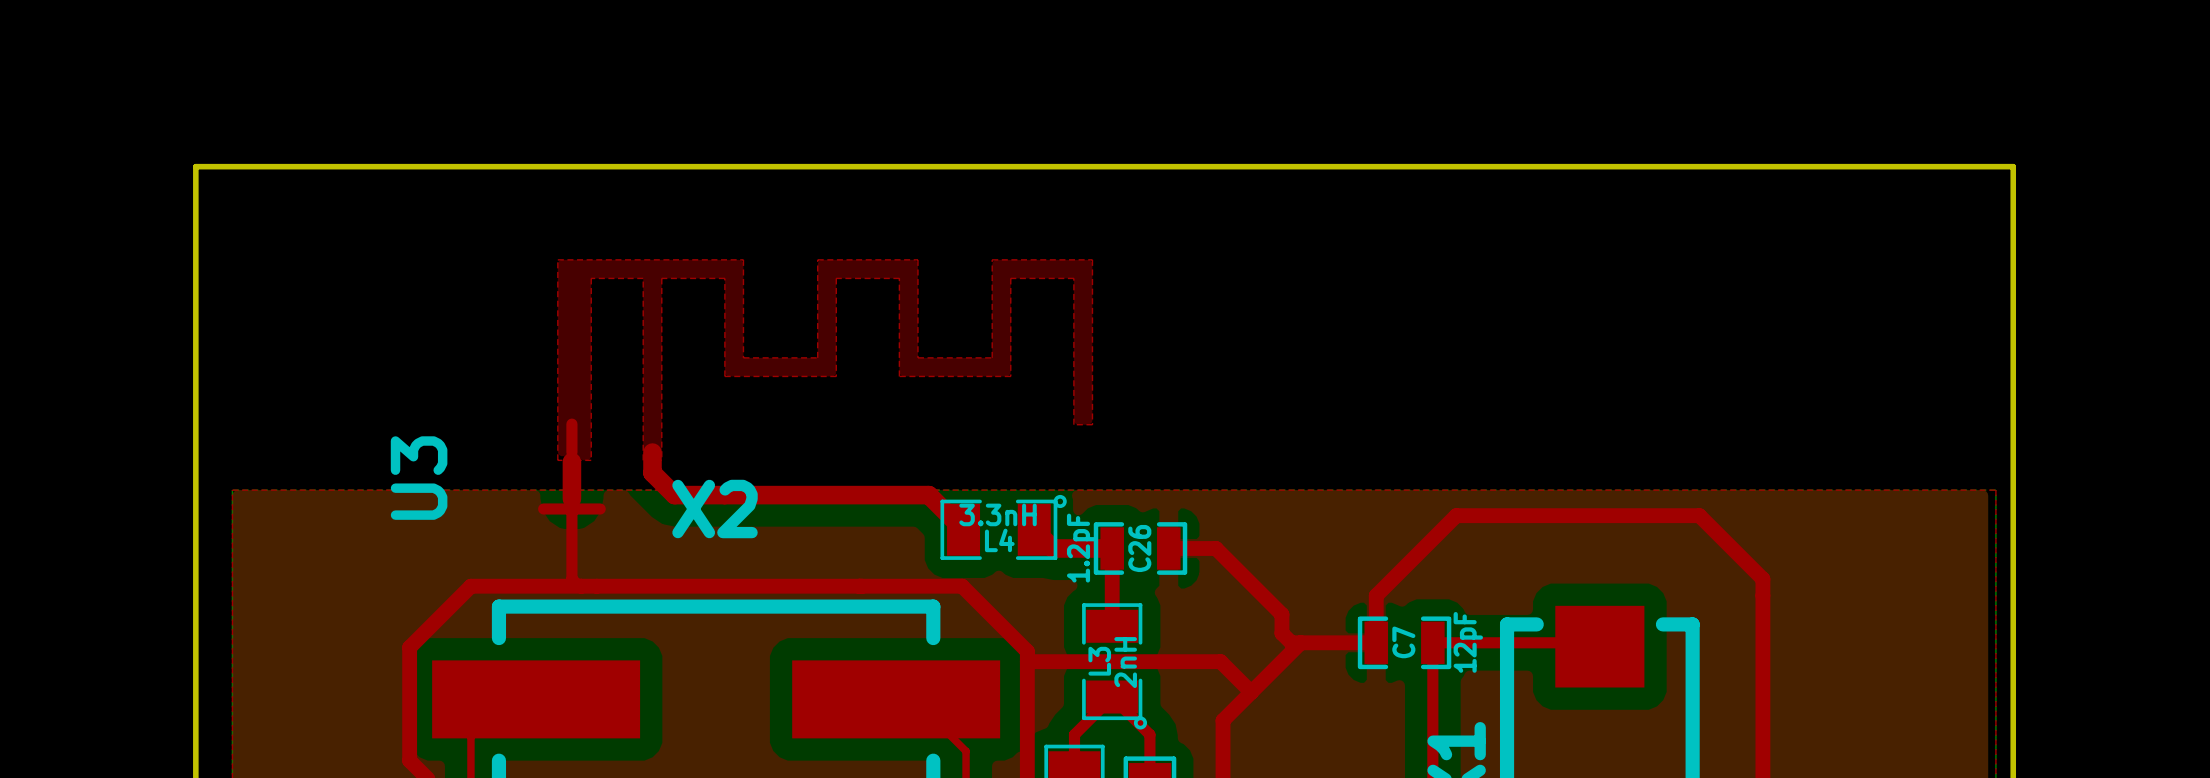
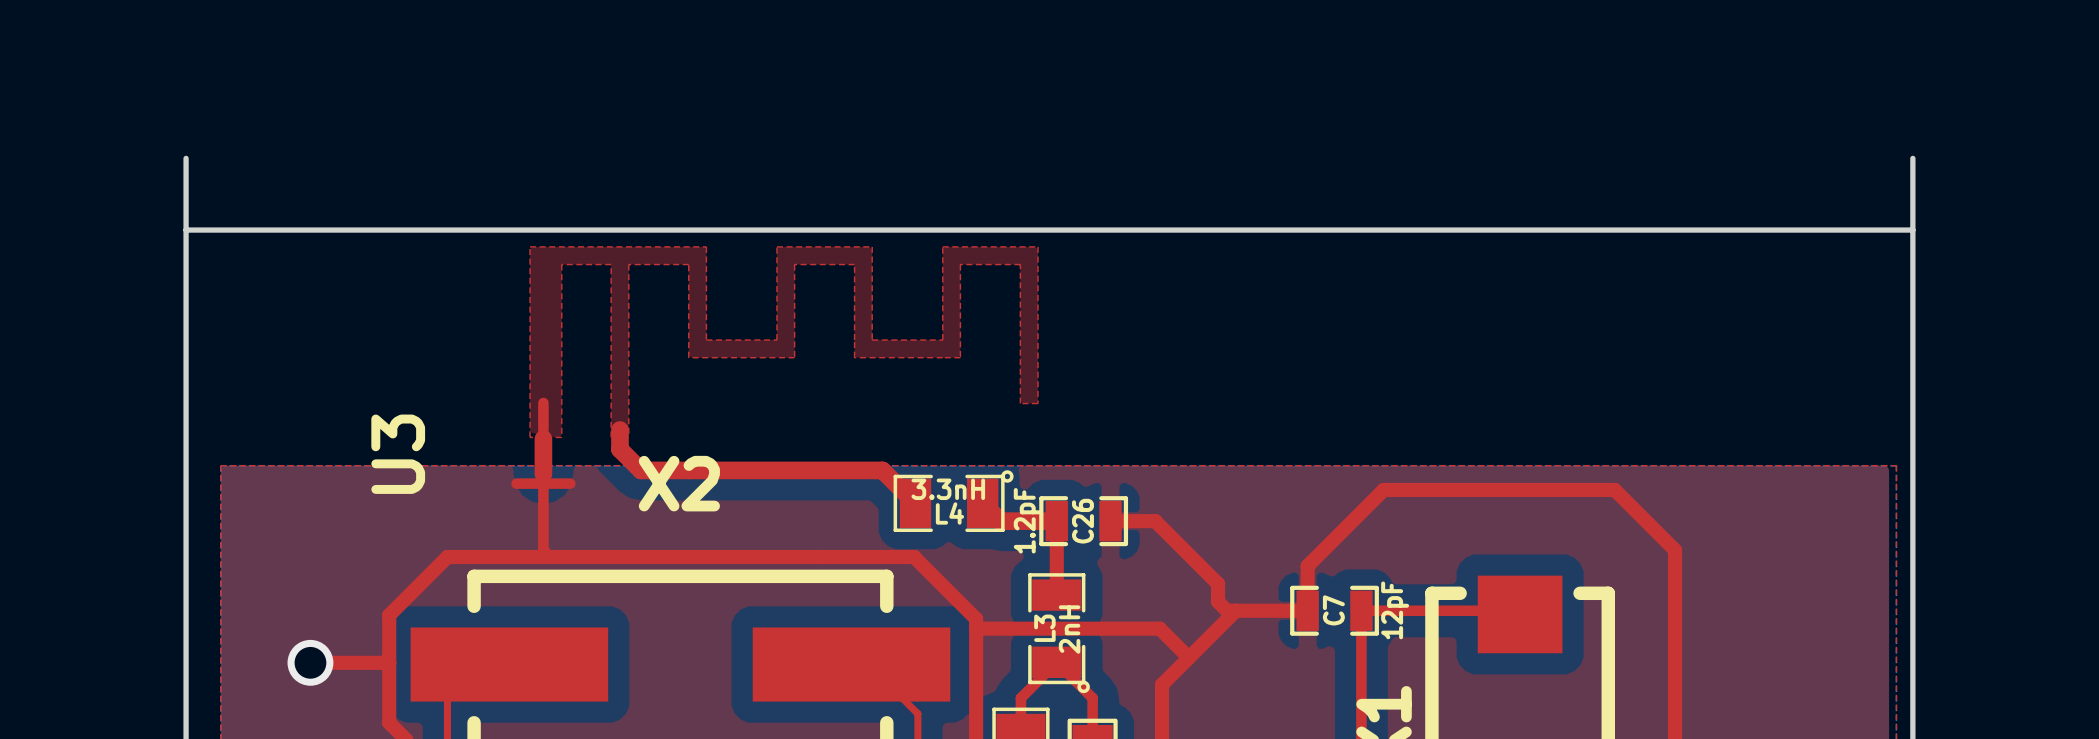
board edge: (195, 166) (2013, 166) -> (186, 230) (1912, 230)
top track: none -> (310, 662) (389, 662)
via: none -> (310, 662)

